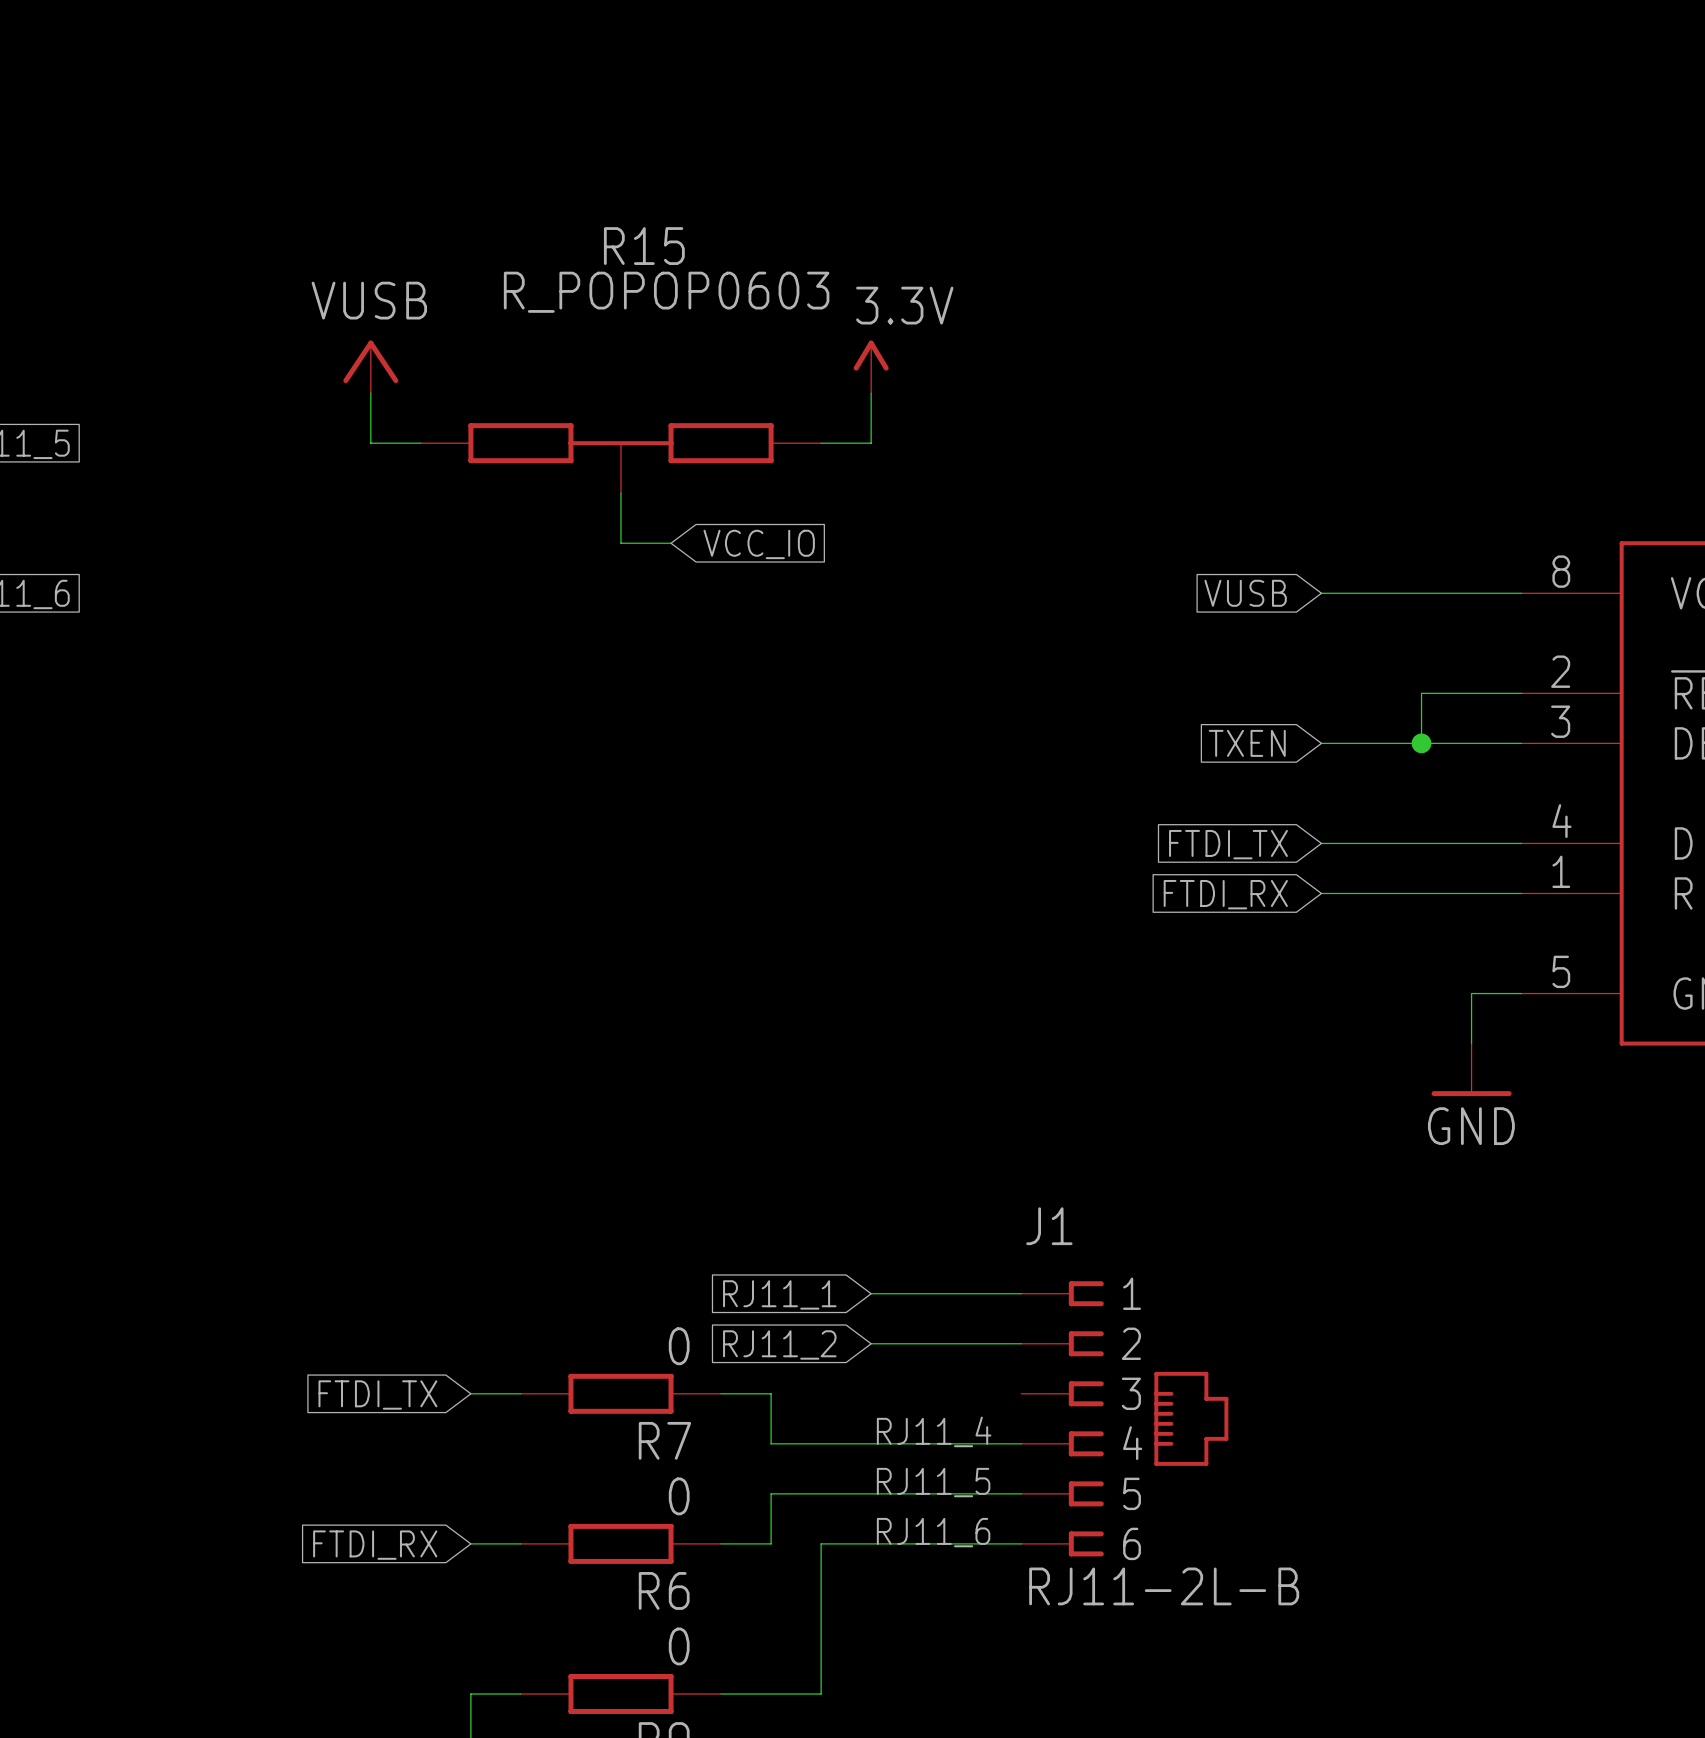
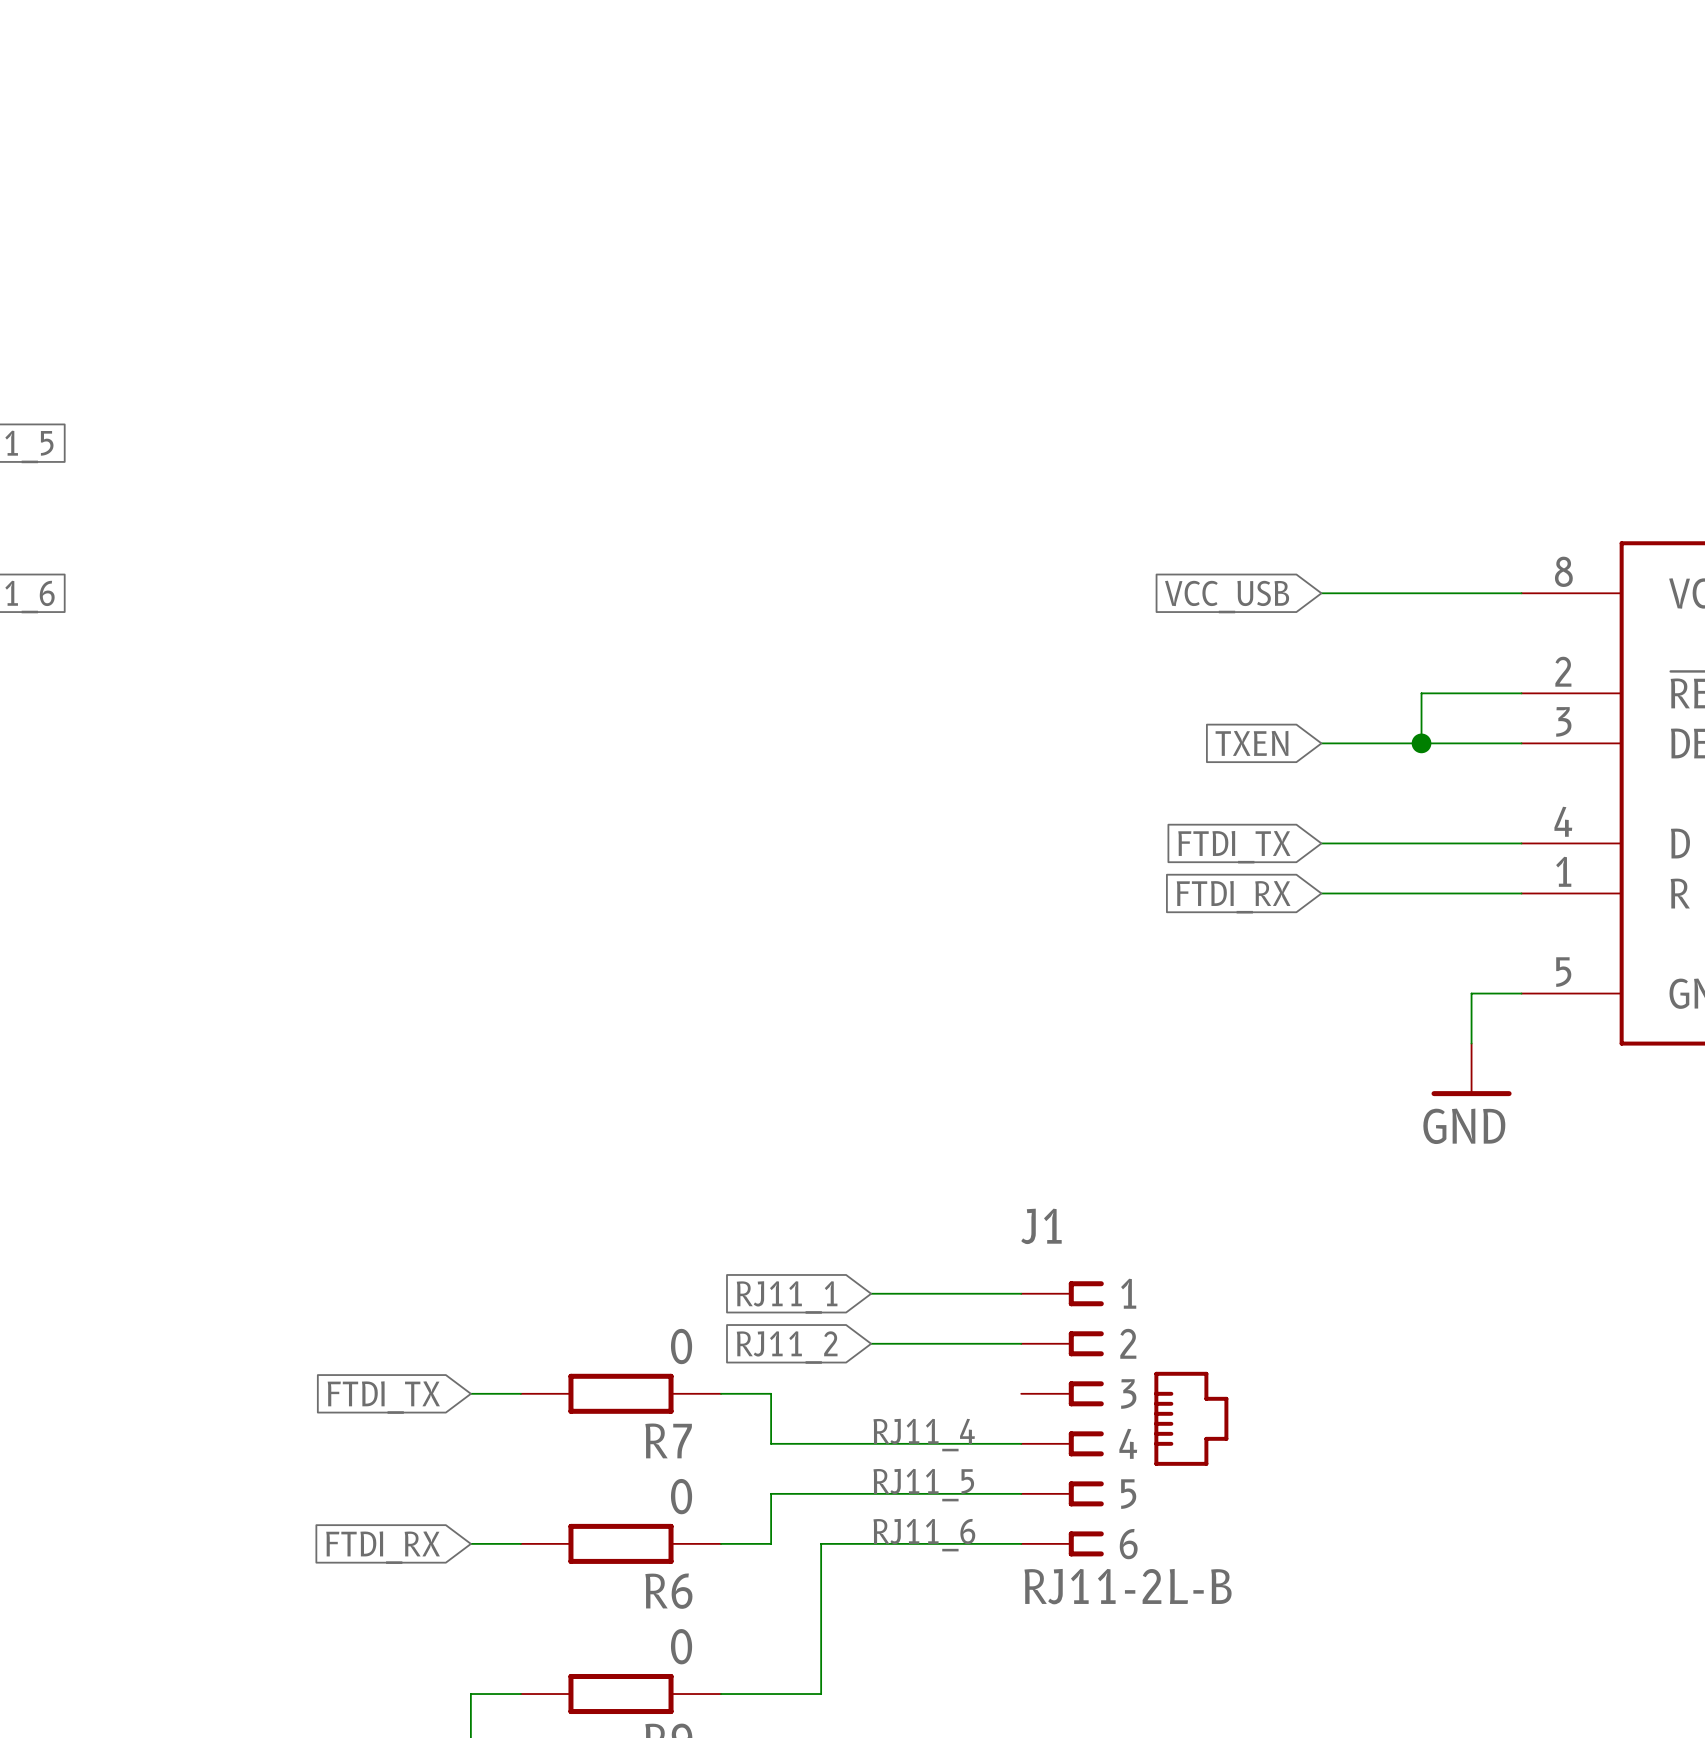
power symbol: VUSB (370, 366) -> none
power symbol: 3.3V (871, 366) -> none
wire: (370, 393) (370, 443) (420, 443) -> none
wire: (871, 393) (871, 443) (821, 443) -> none
R15: R_POPOP0603 (620, 458) -> none
wire: (620, 493) (620, 543) (671, 543) -> none
global label: VCC_IO (759, 544) -> none
global label: VUSB (1245, 593) -> VCC_USB (1227, 597)

